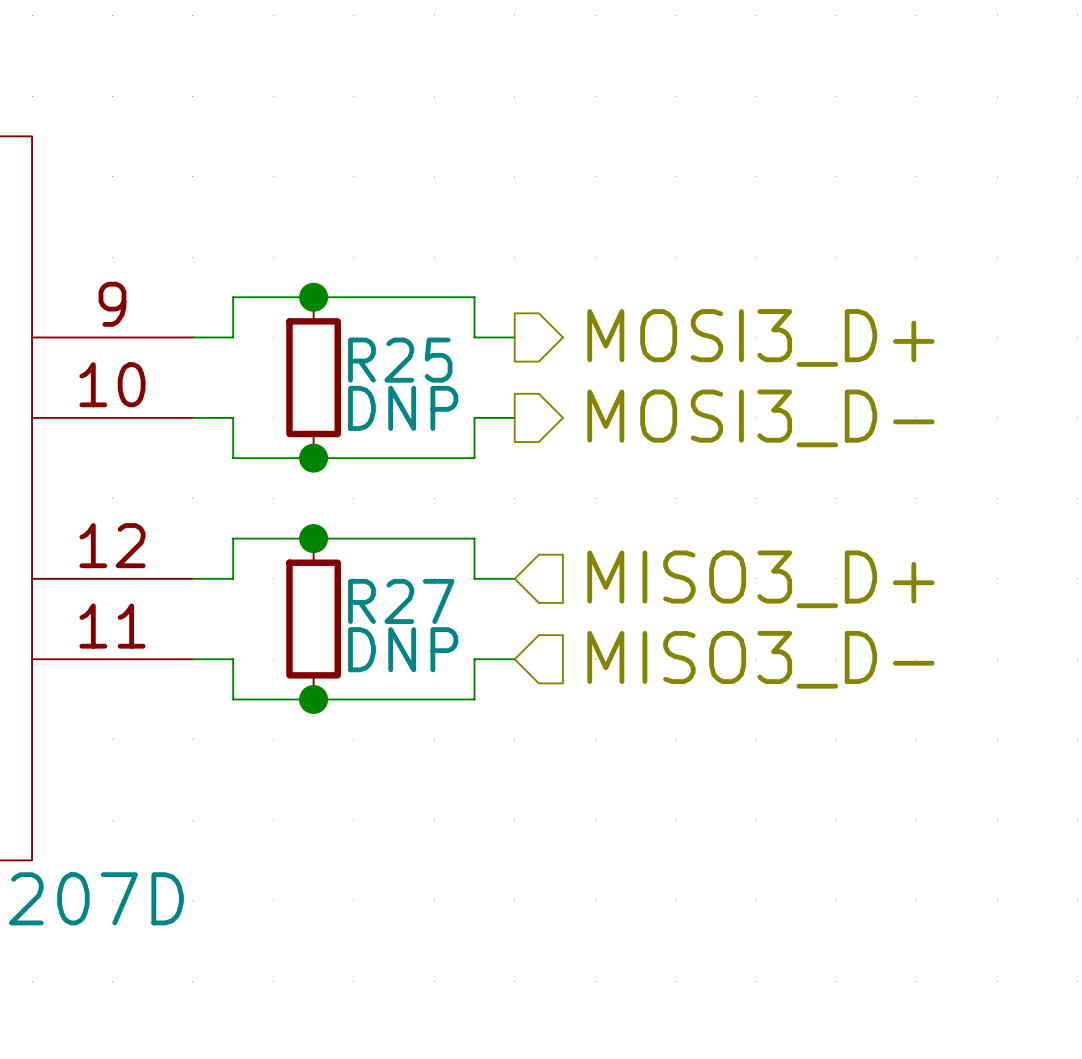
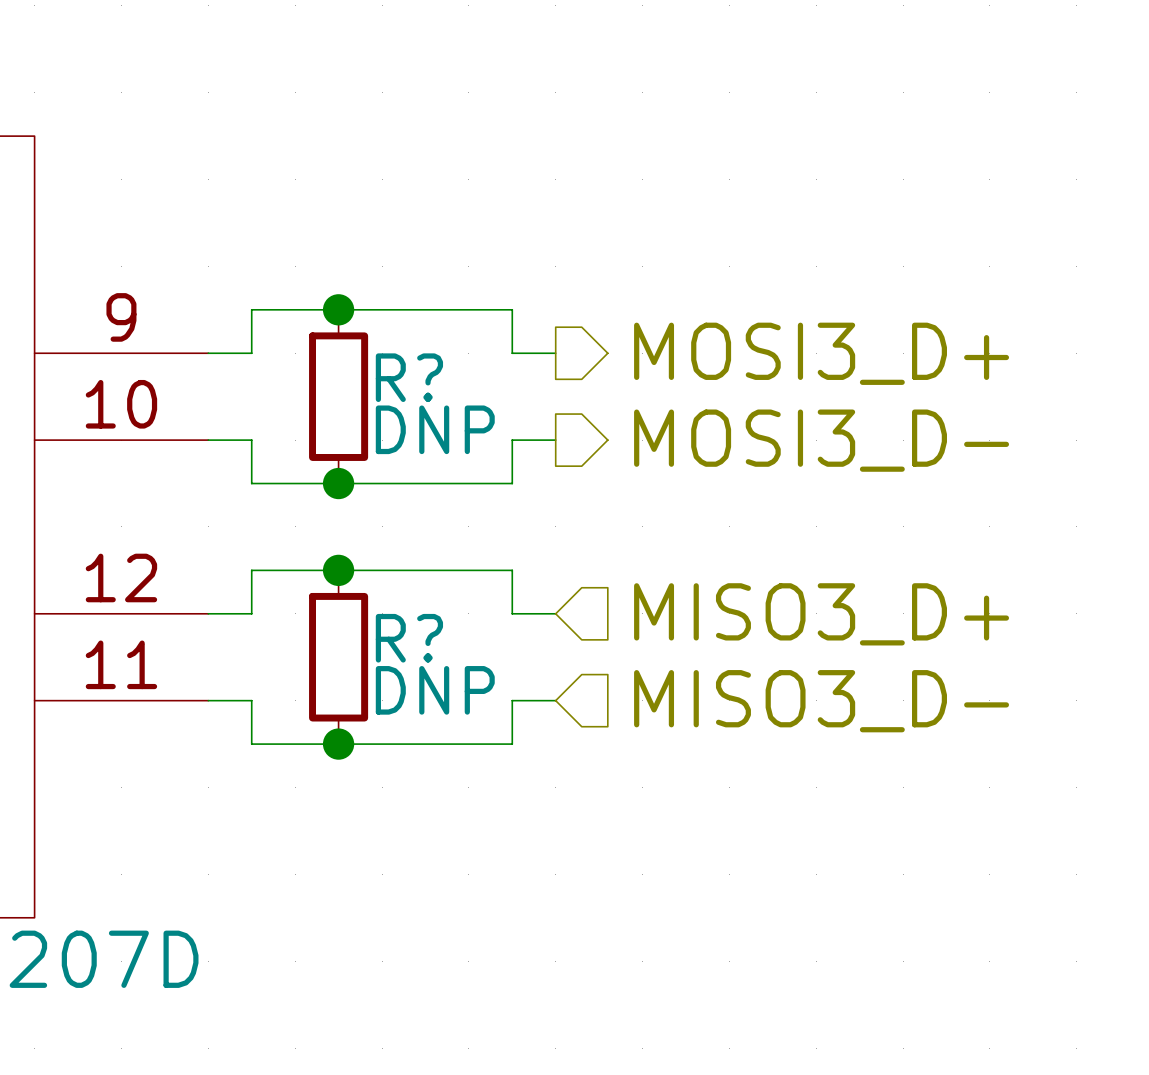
R25 name: R25 (400, 360) -> R? (409, 377)
R27 name: R27 (401, 601) -> R? (409, 638)

